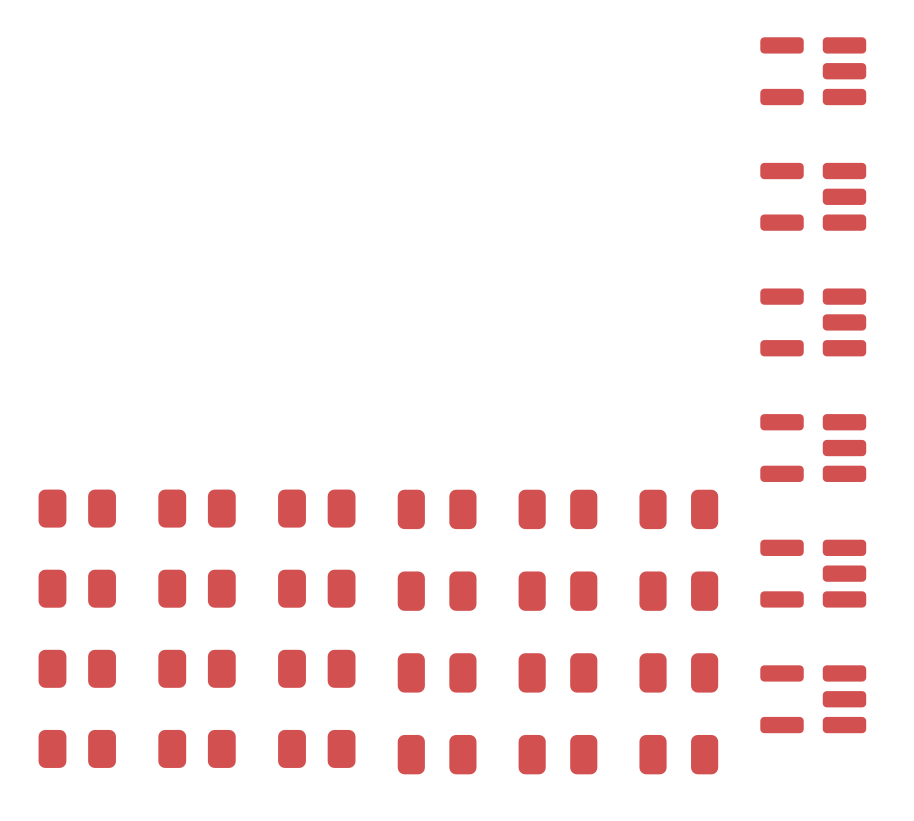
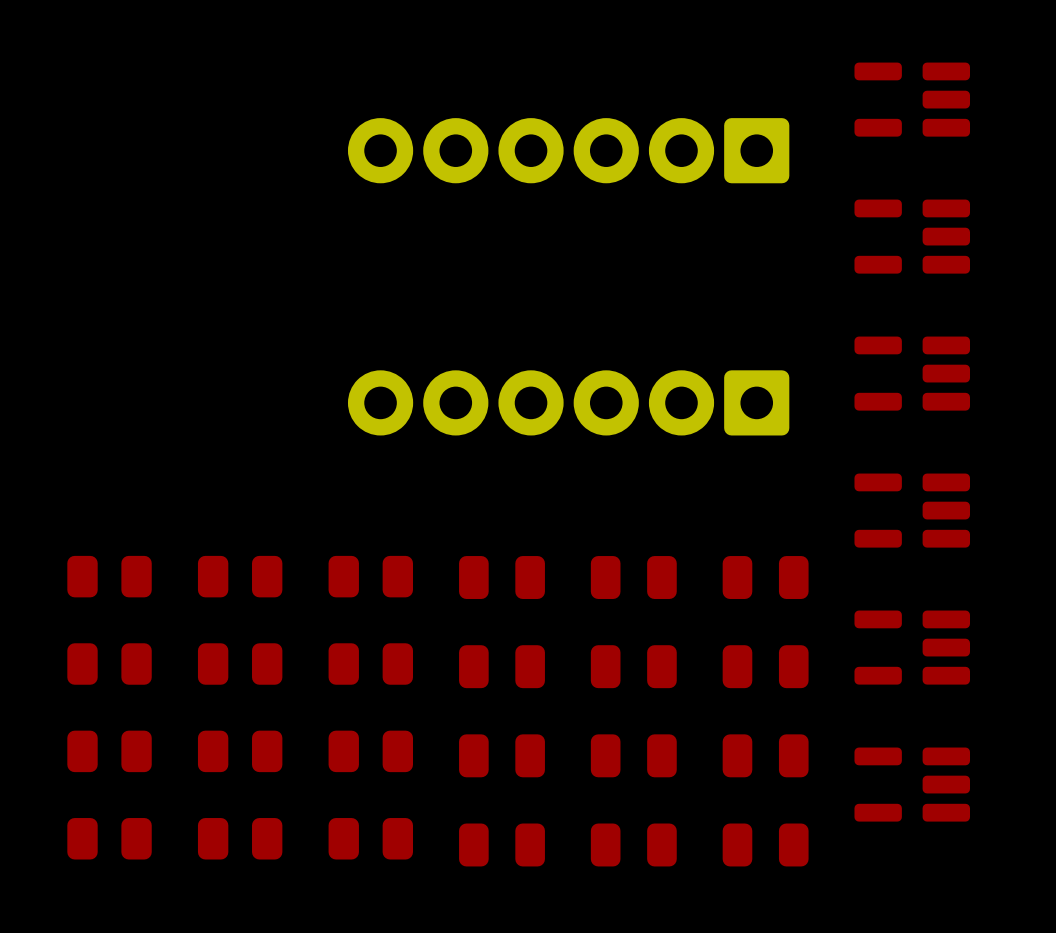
part: none -> (568, 150)
part: none -> (568, 402)

